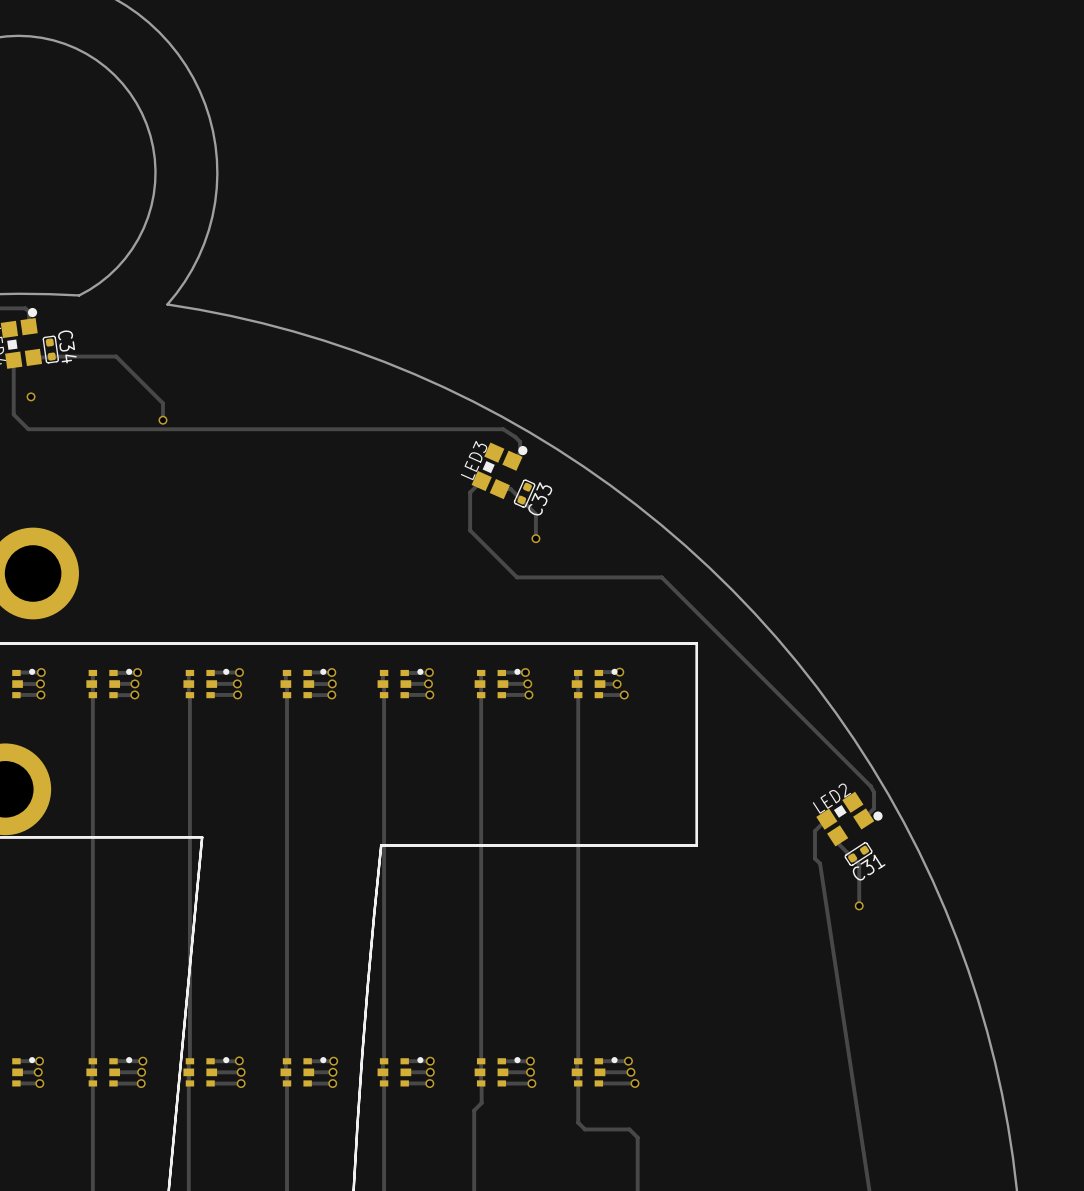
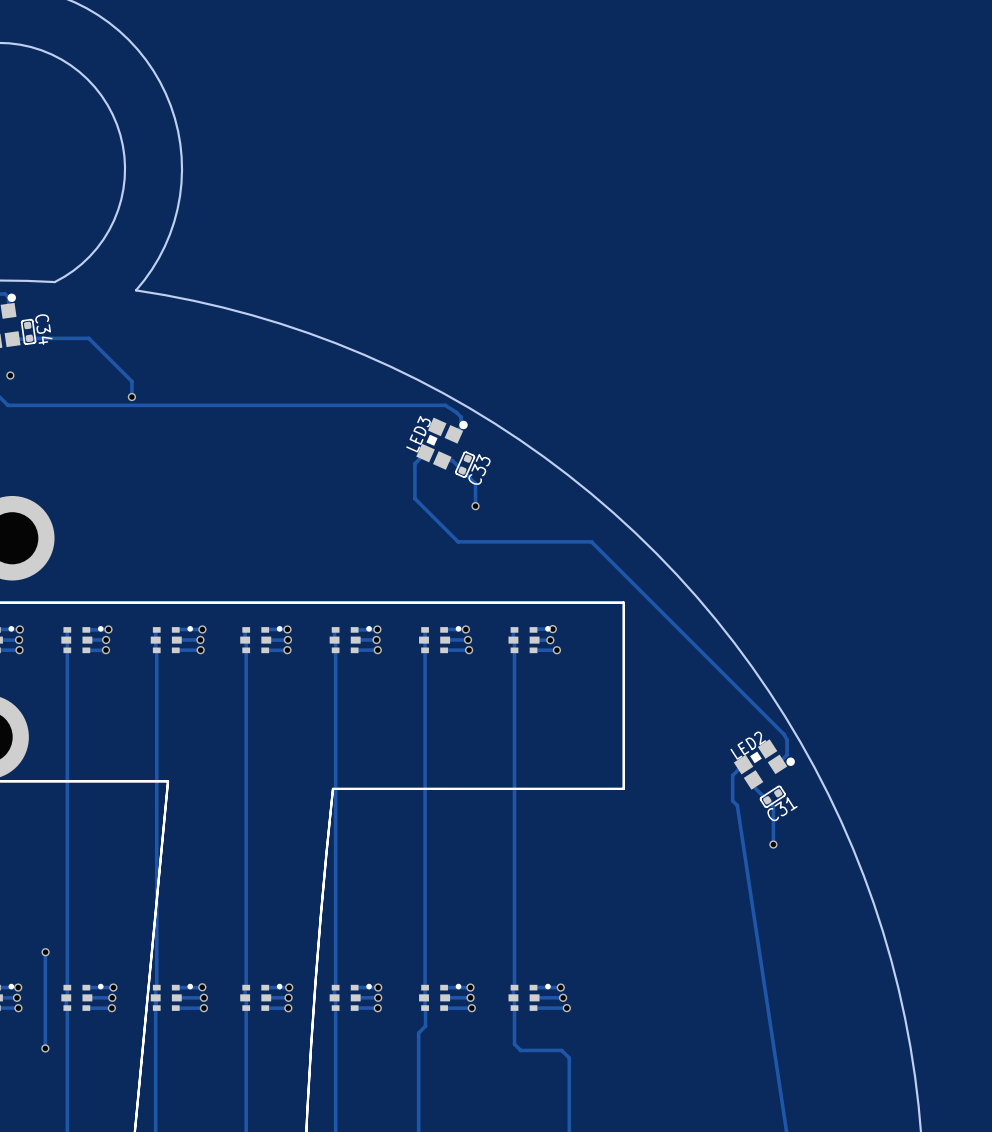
track: none -> (45, 952) (45, 1048)
via: none -> (45, 952)
via: none -> (45, 1048)

